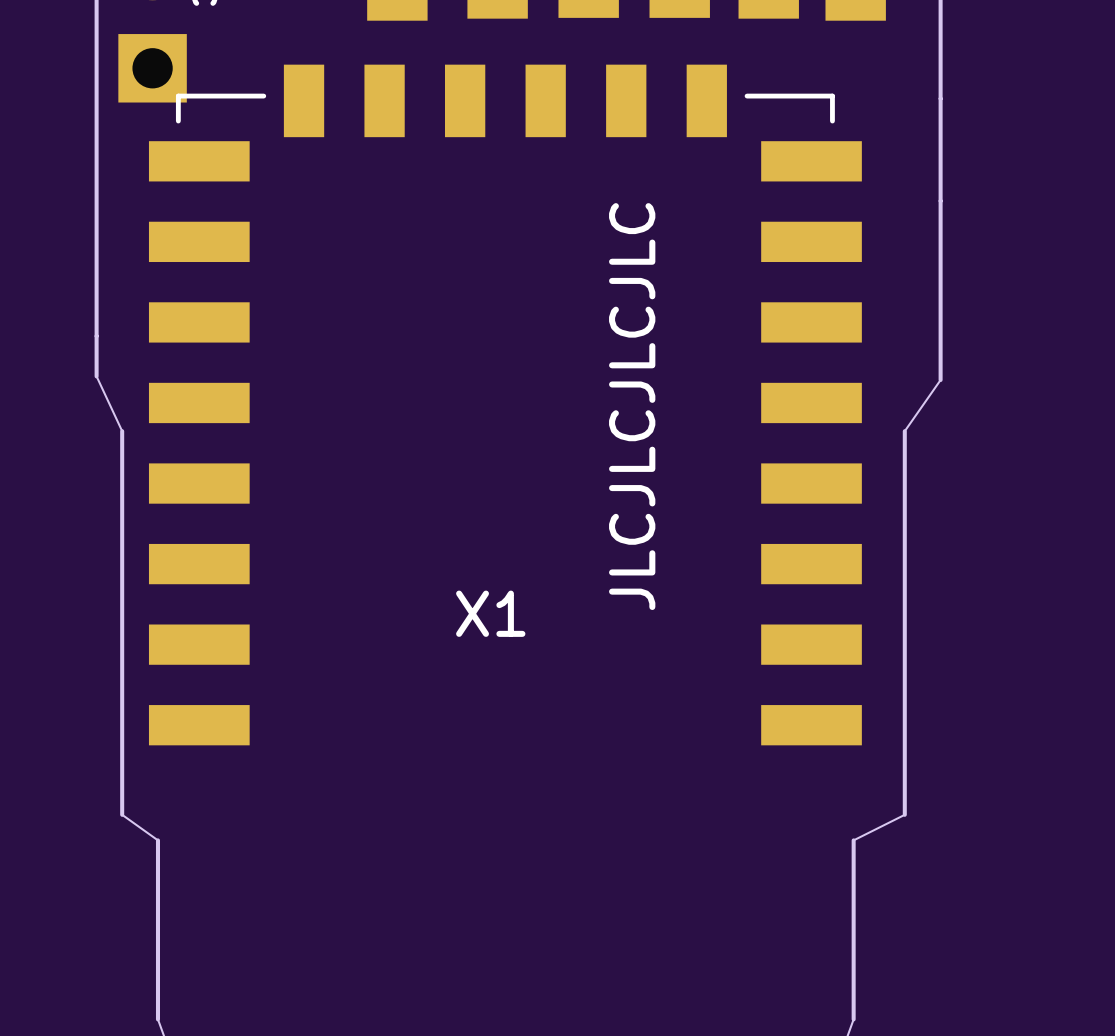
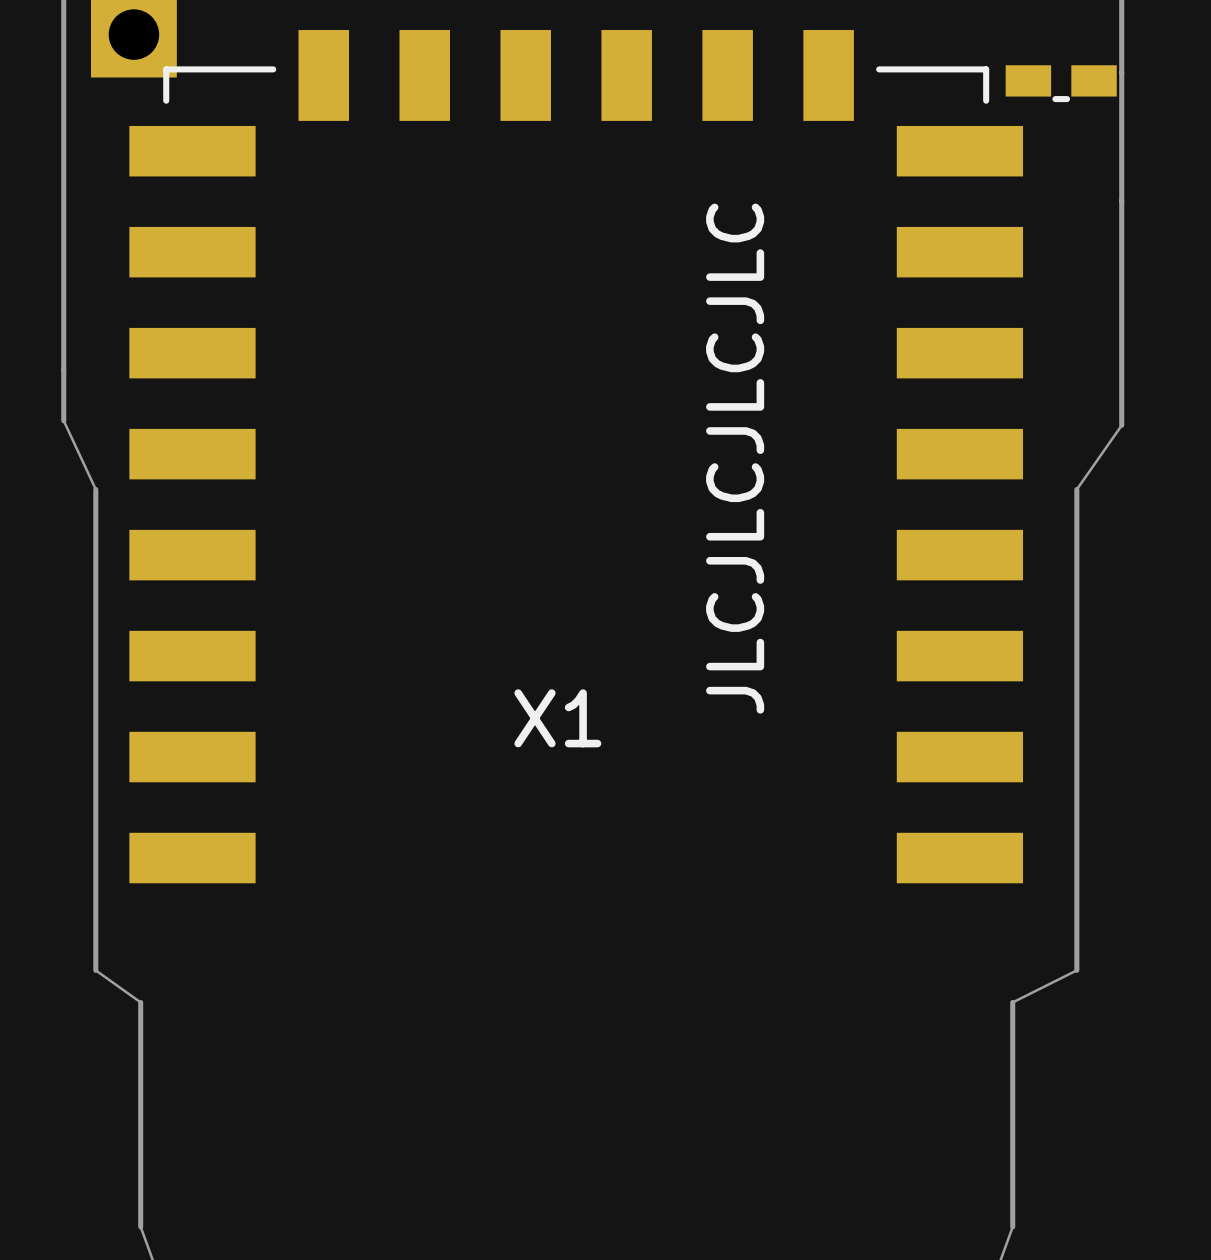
part: none -> (1061, 83)

